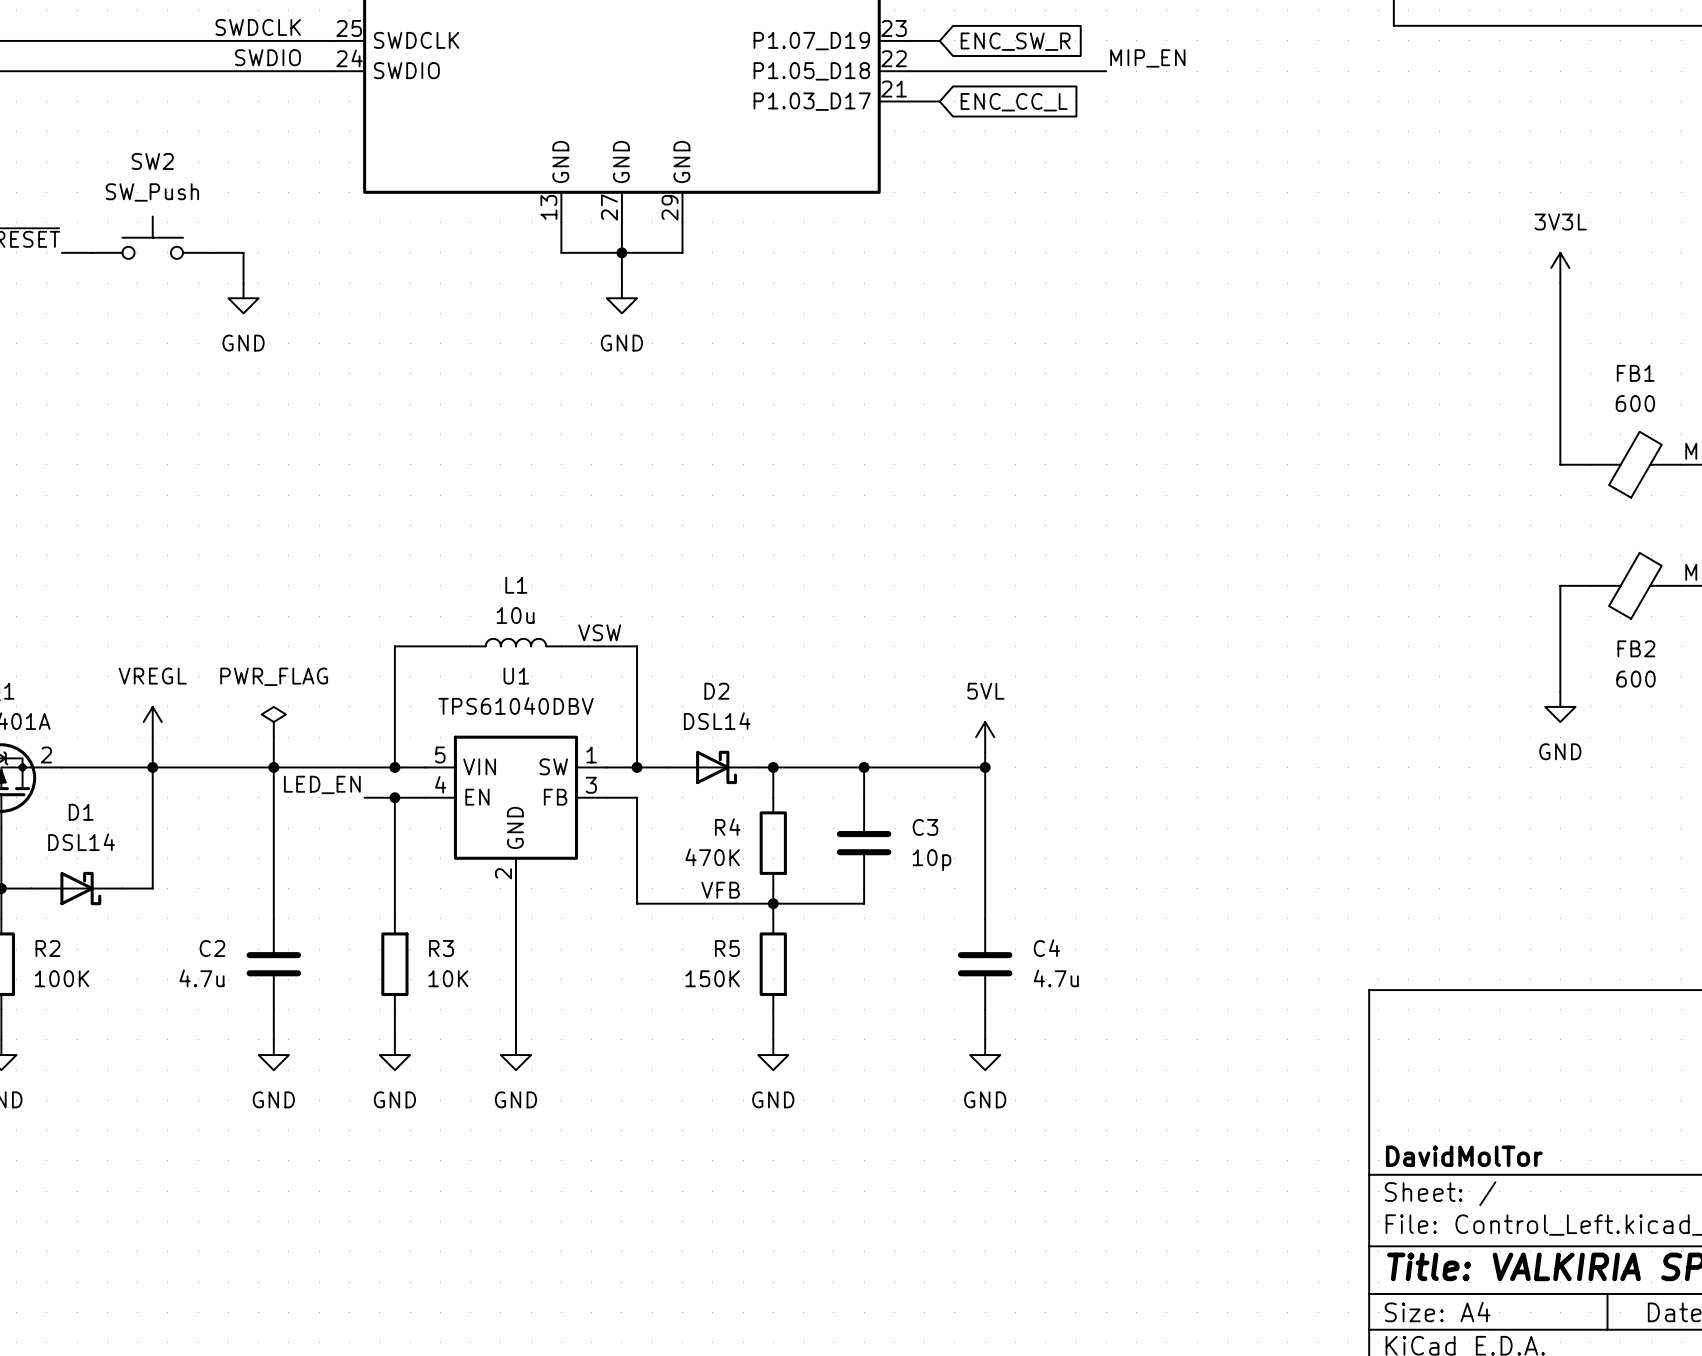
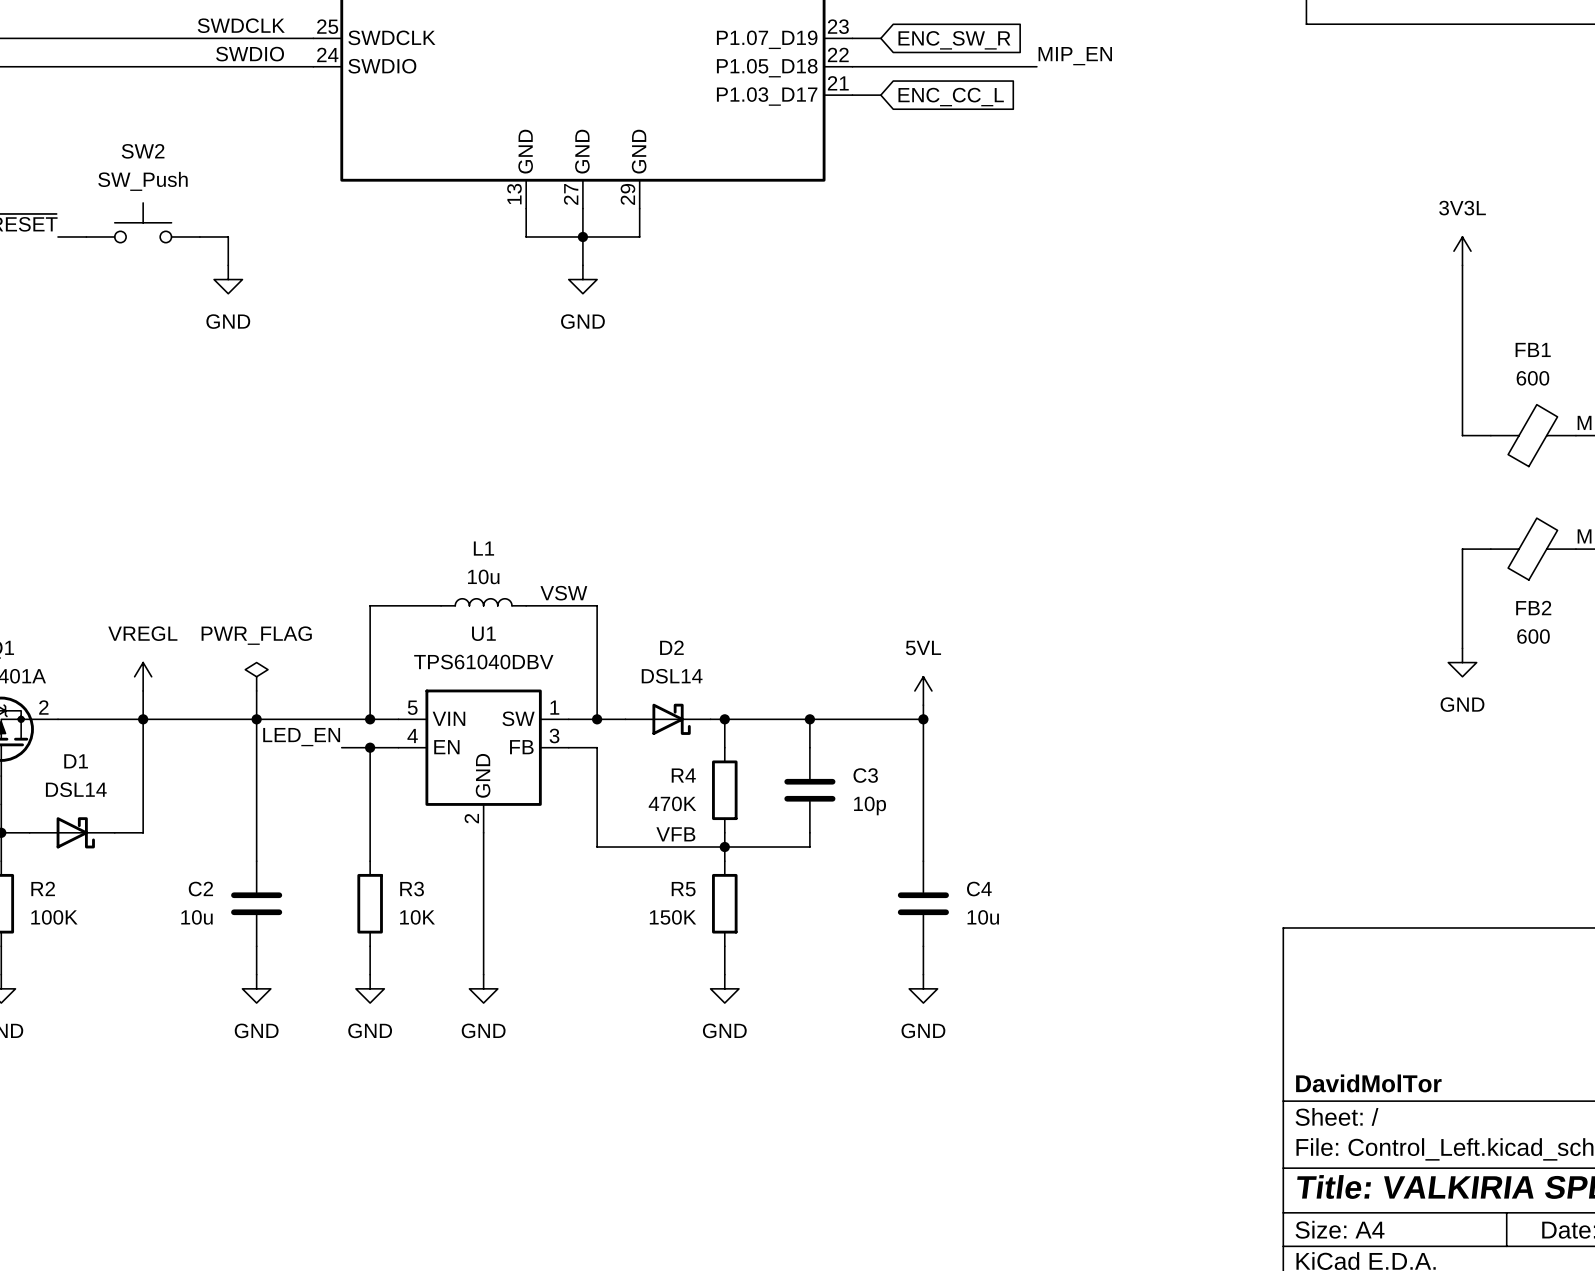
C2 value: 4.7u (201, 978) -> 10u (196, 917)
C4 value: 4.7u (1056, 978) -> 10u (983, 917)

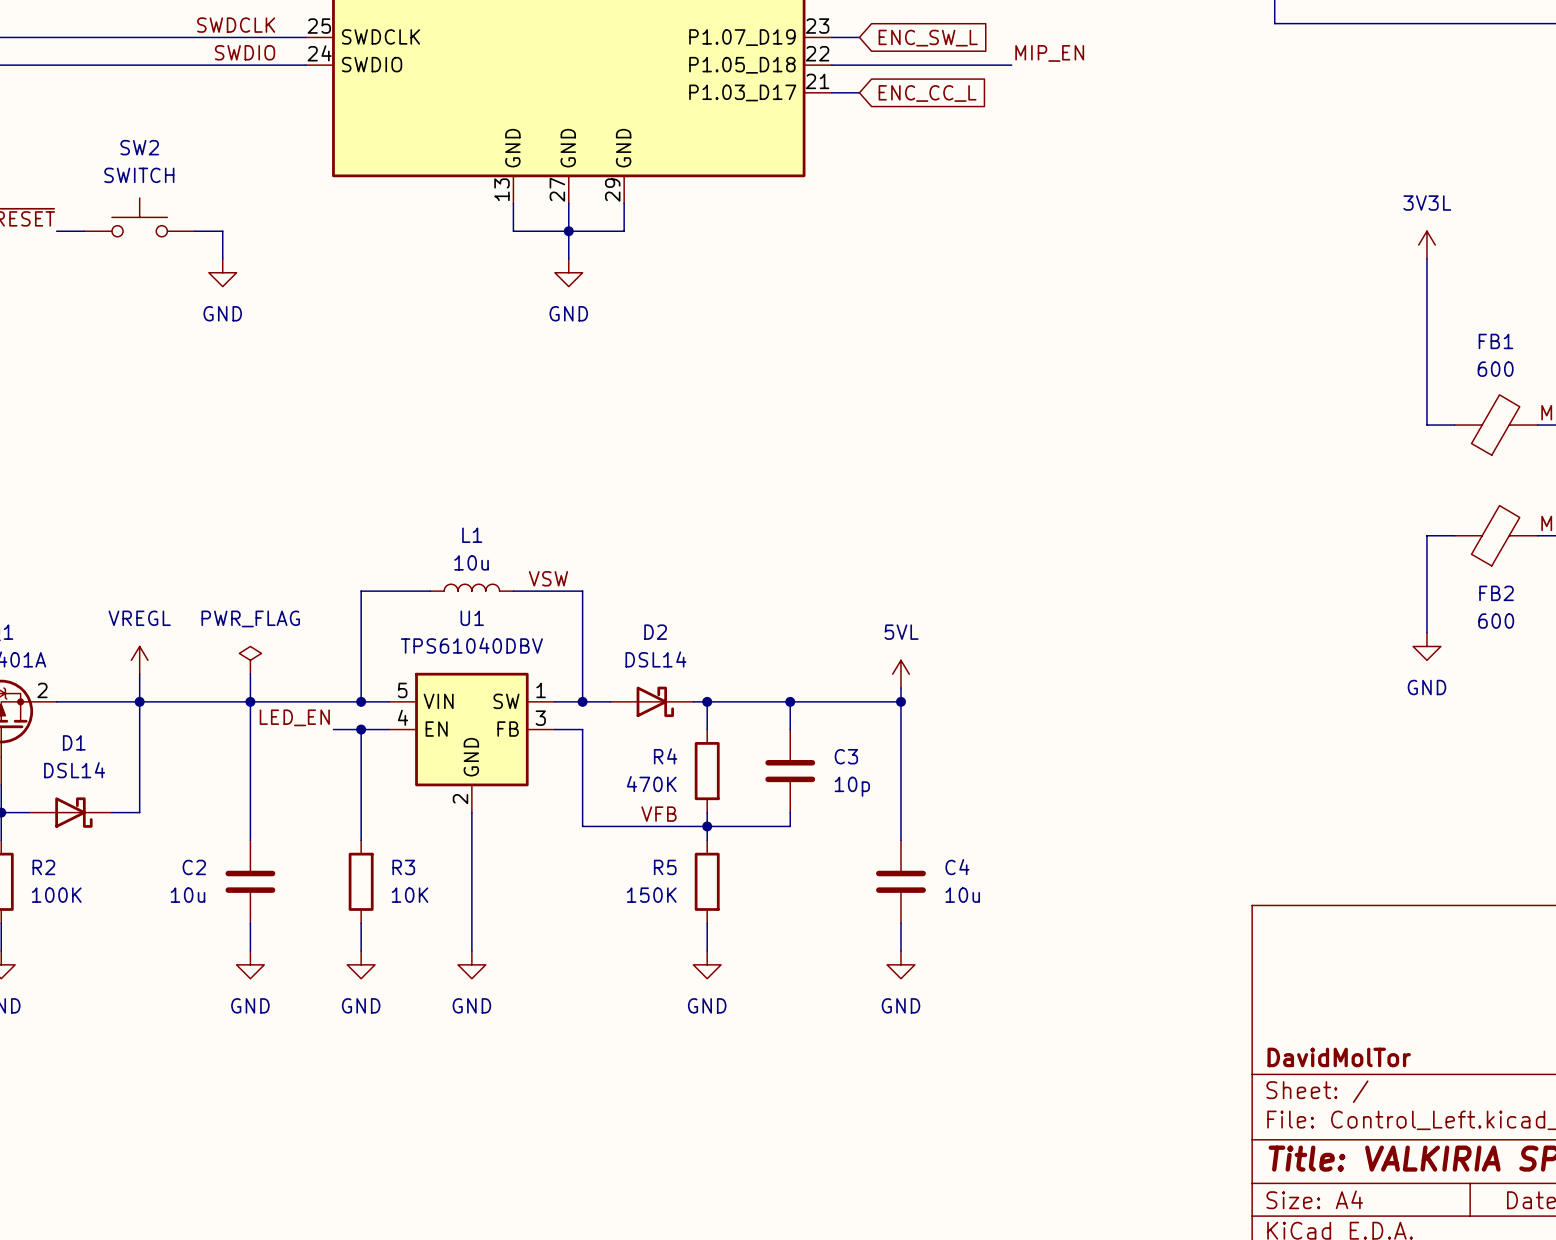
global label: ENC_SW_R (954, 40) -> ENC_SW_L (928, 38)
SW2 value: SW_Push (142, 181) -> SWITCH (139, 175)

